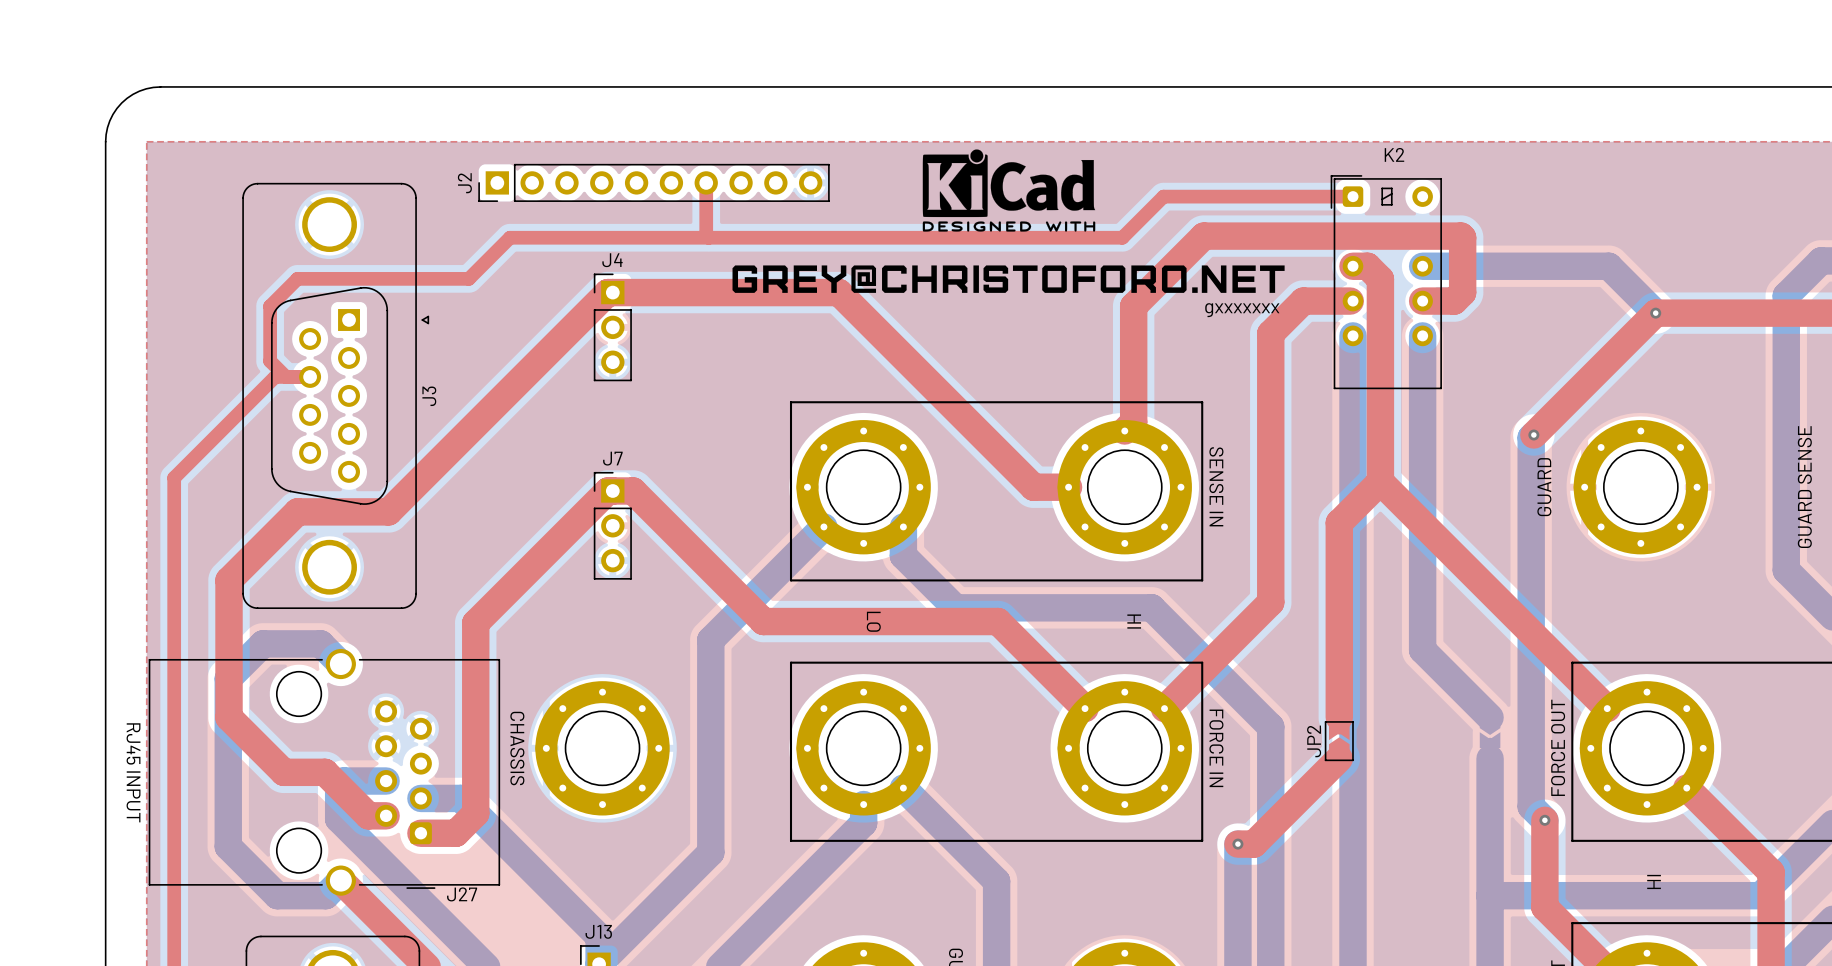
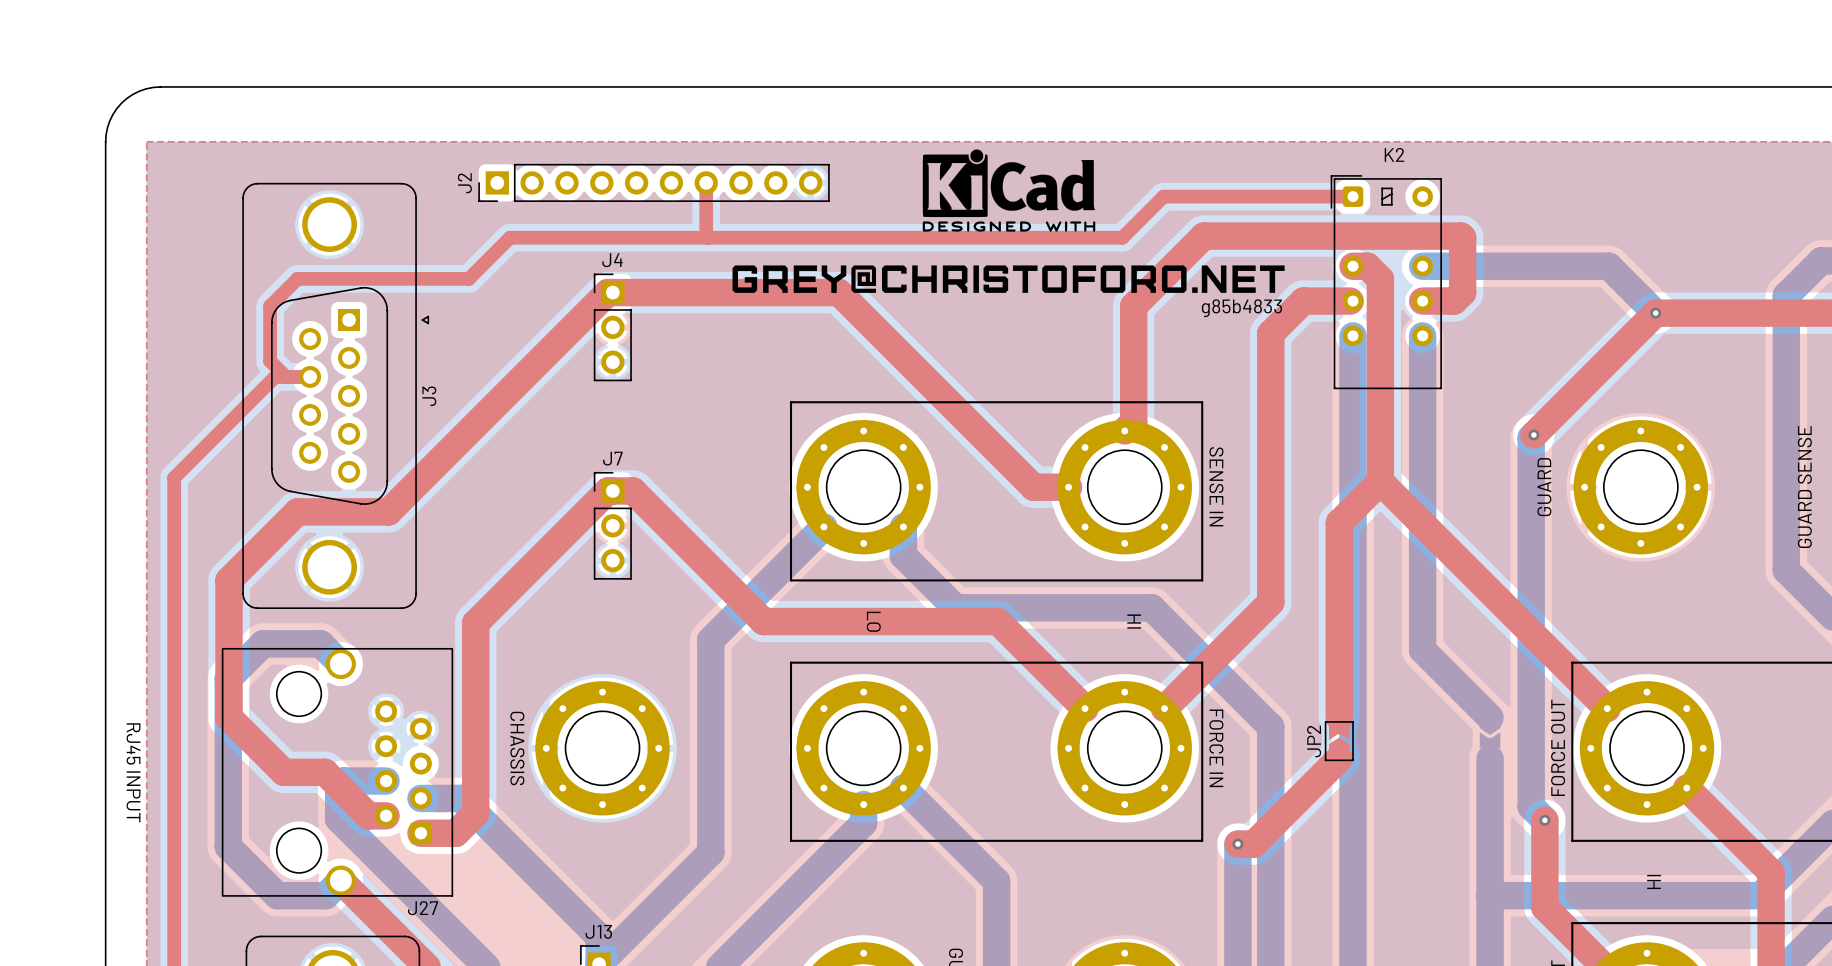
text: gxxxxxxx (1242, 310) -> g85b4833 (1241, 308)
J27 footprint: [148, 648, 501, 896] -> [221, 647, 454, 897]
J27 name position: J27 (462, 894) -> J27 (423, 908)

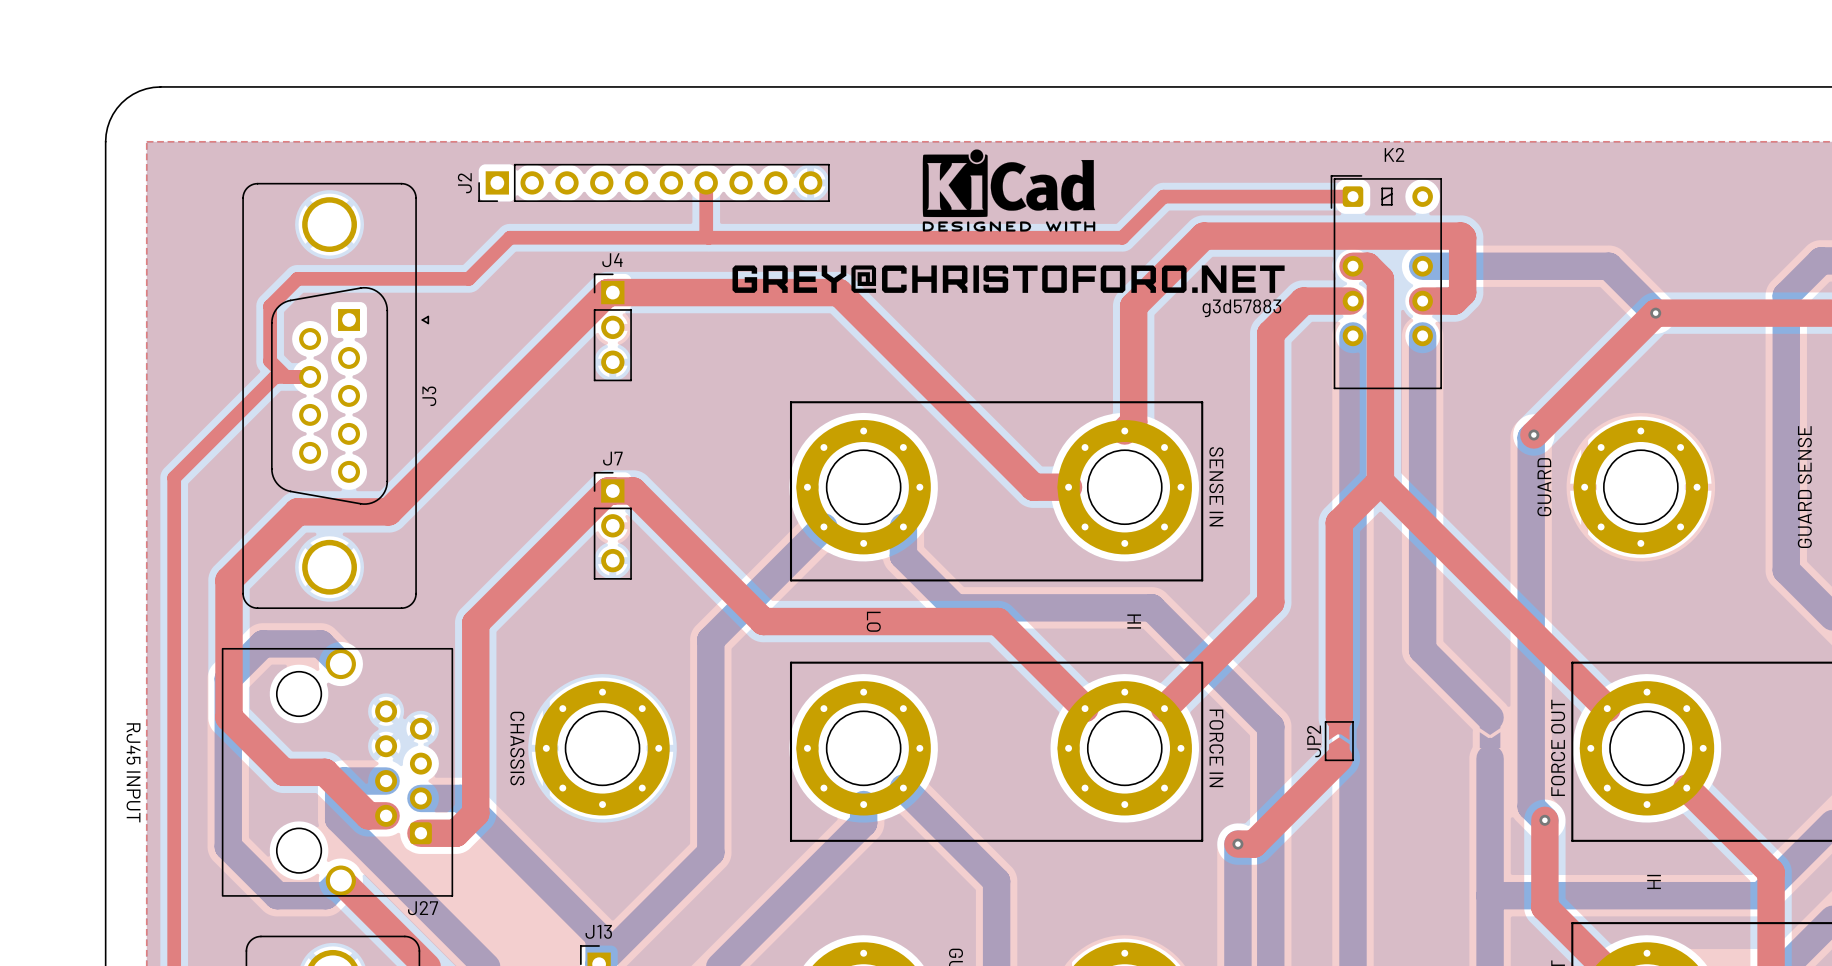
text: g85b4833 (1241, 308) -> g3d57883 (1241, 308)

